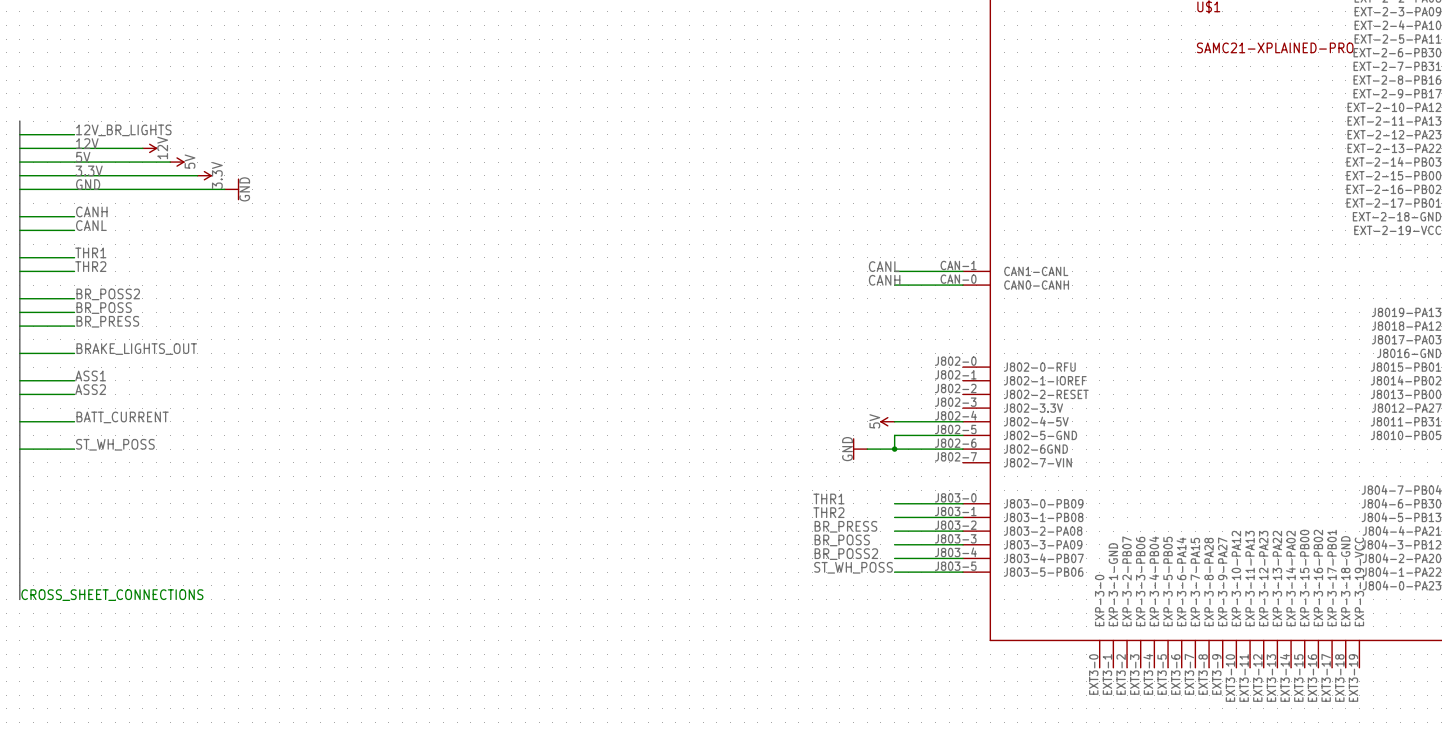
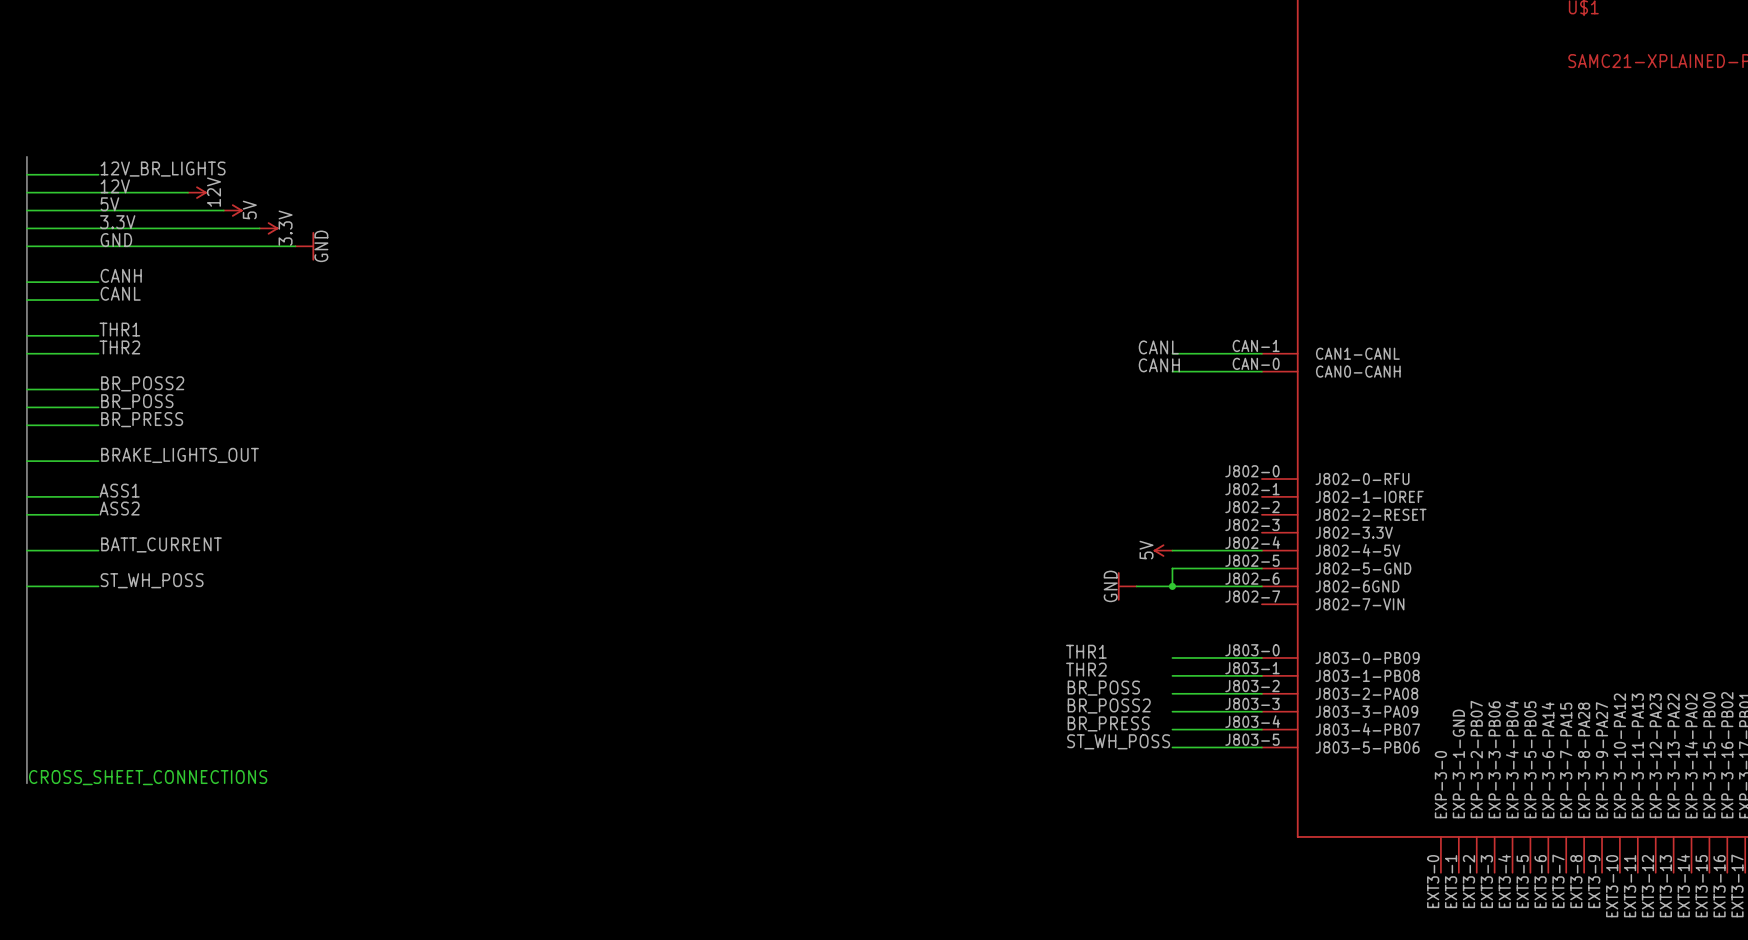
label: BR_PRESS (845, 526) -> BR_POSS (1103, 688)
label: BR_POSS (842, 540) -> BR_POSS2 (1109, 706)
label: BR_POSS2 (846, 554) -> BR_PRESS (1108, 723)

